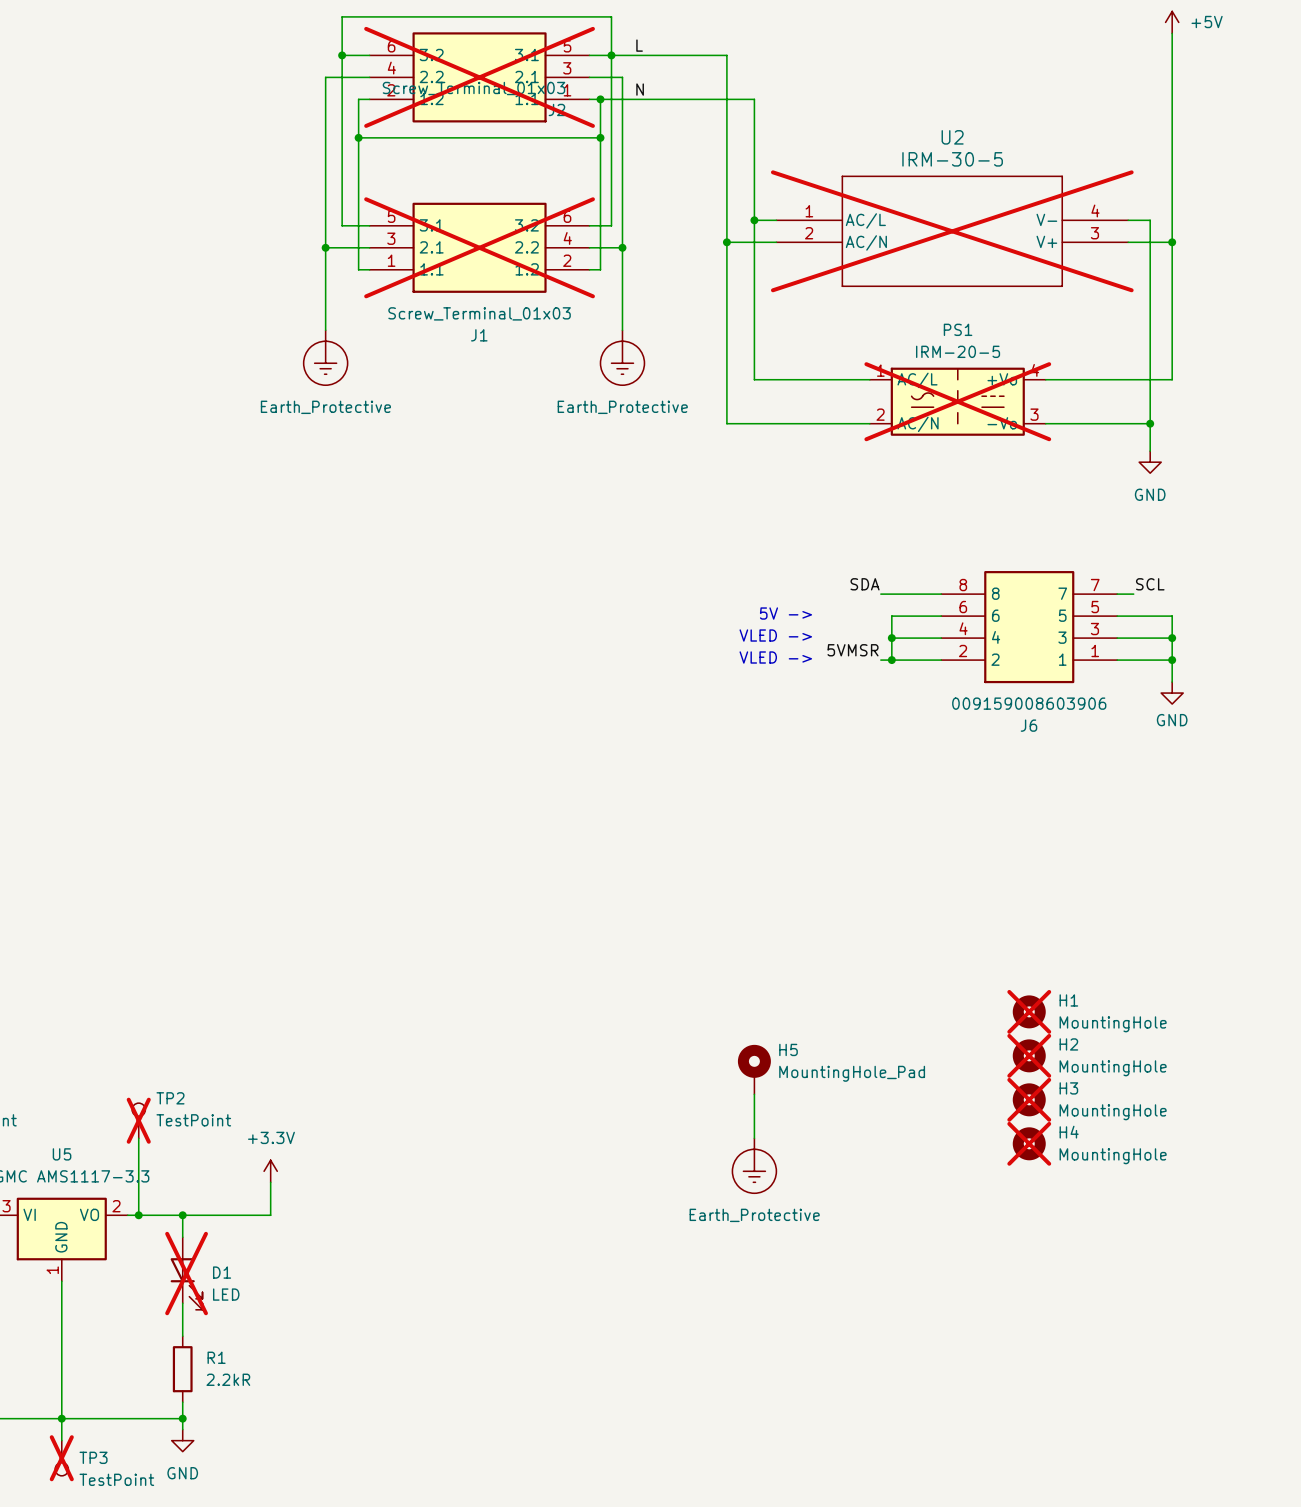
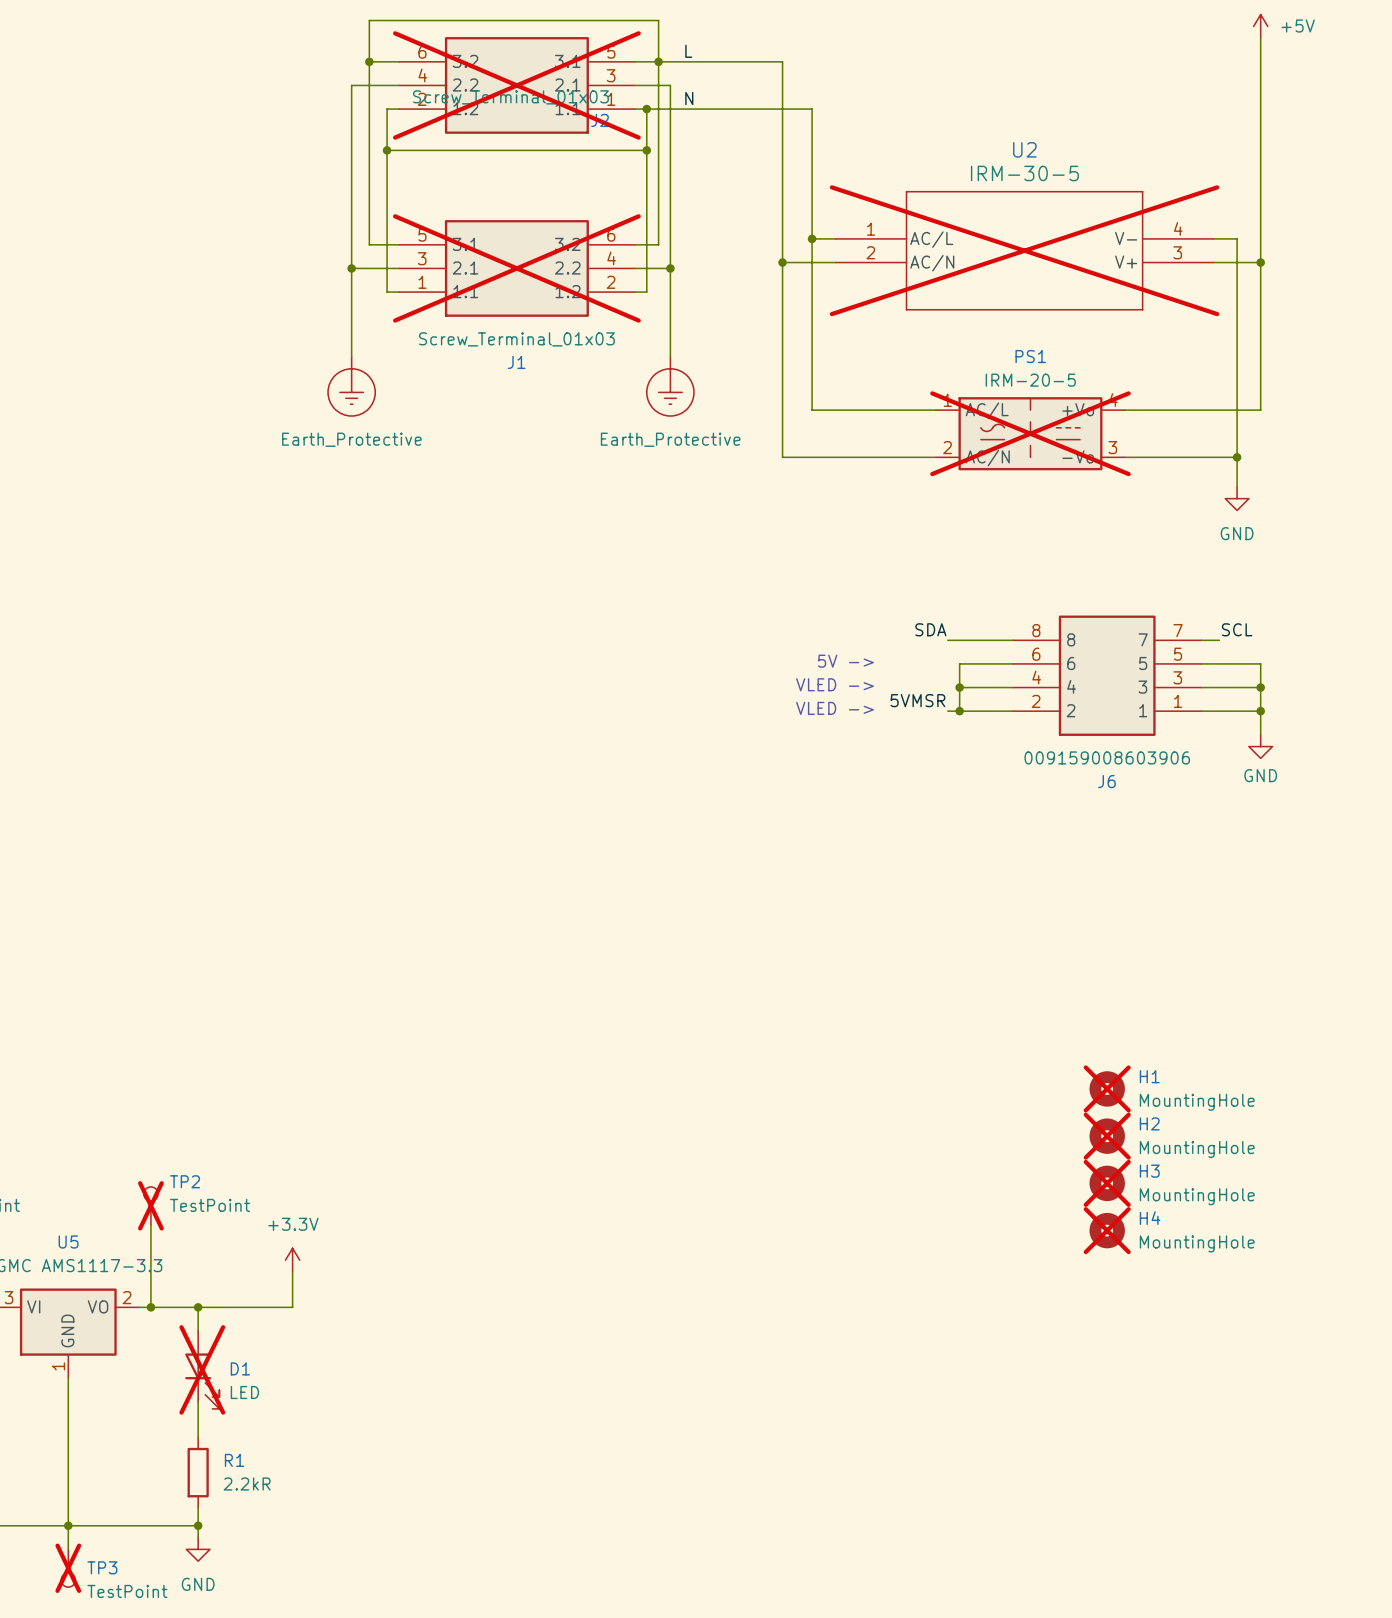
H5: MountingHole_Pad (754, 1069) -> none
wire: (754, 1094) (754, 1138) -> none
power symbol: Earth_Protective (754, 1165) -> none

